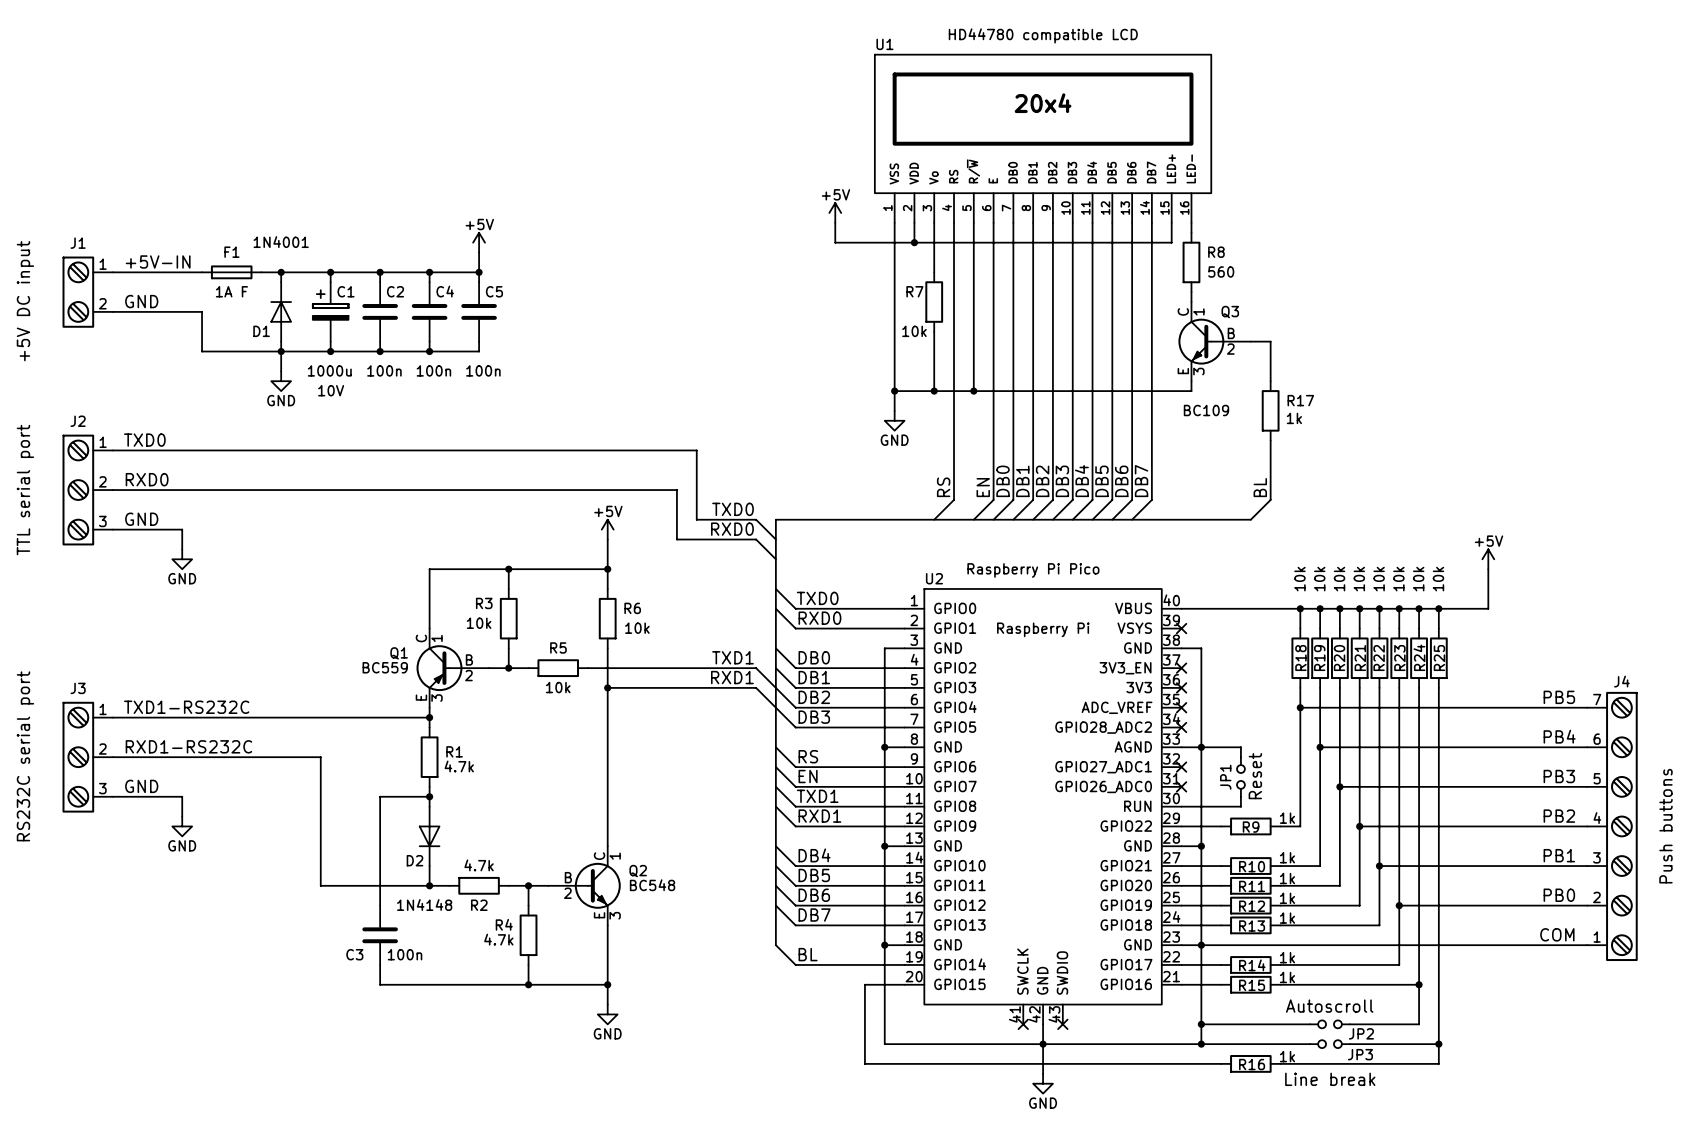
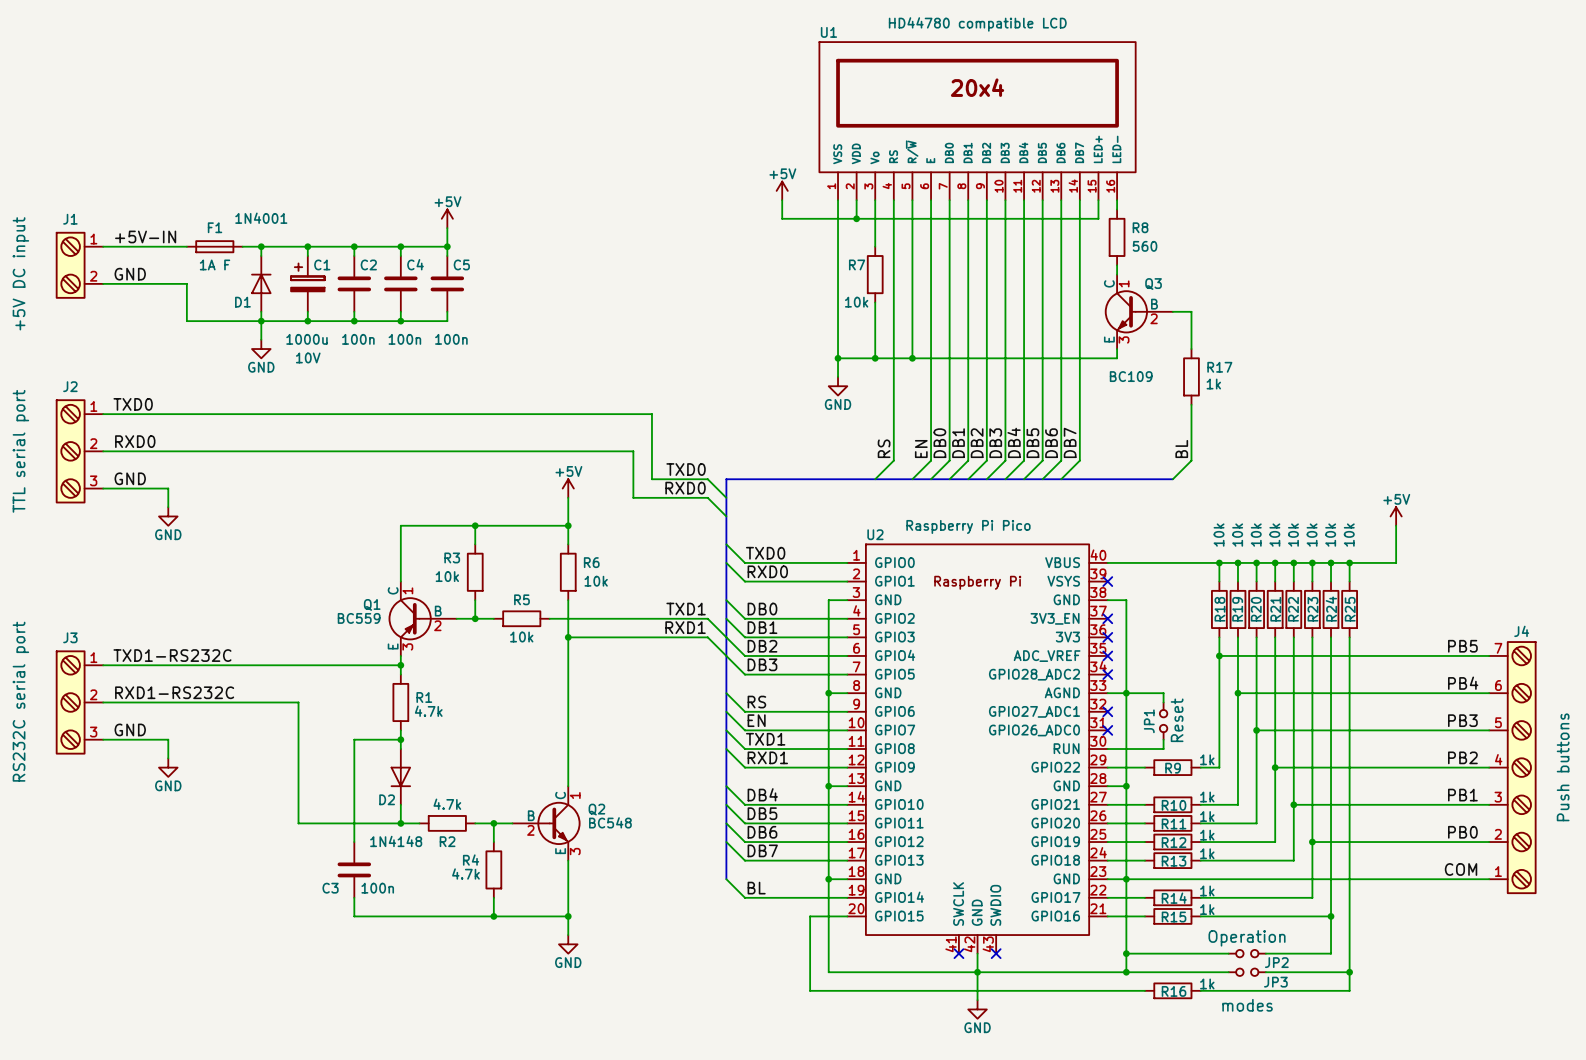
JP2 text: Autoscroll (1329, 1006) -> Operation (1247, 938)
JP3 text: Line break (1330, 1079) -> modes (1247, 1005)

